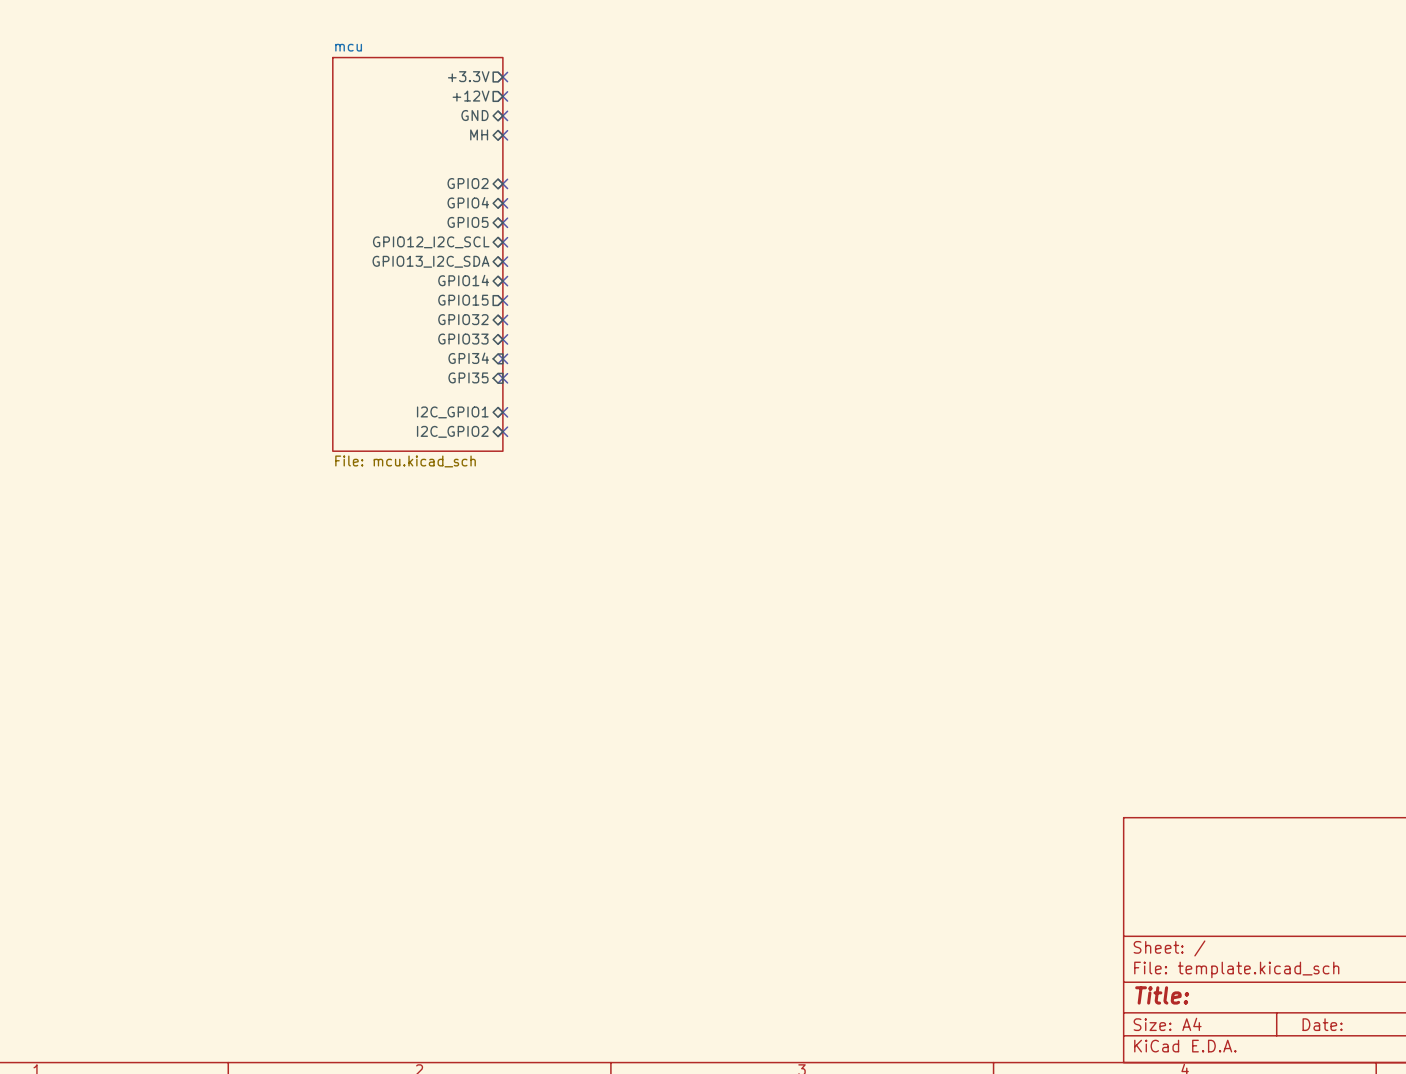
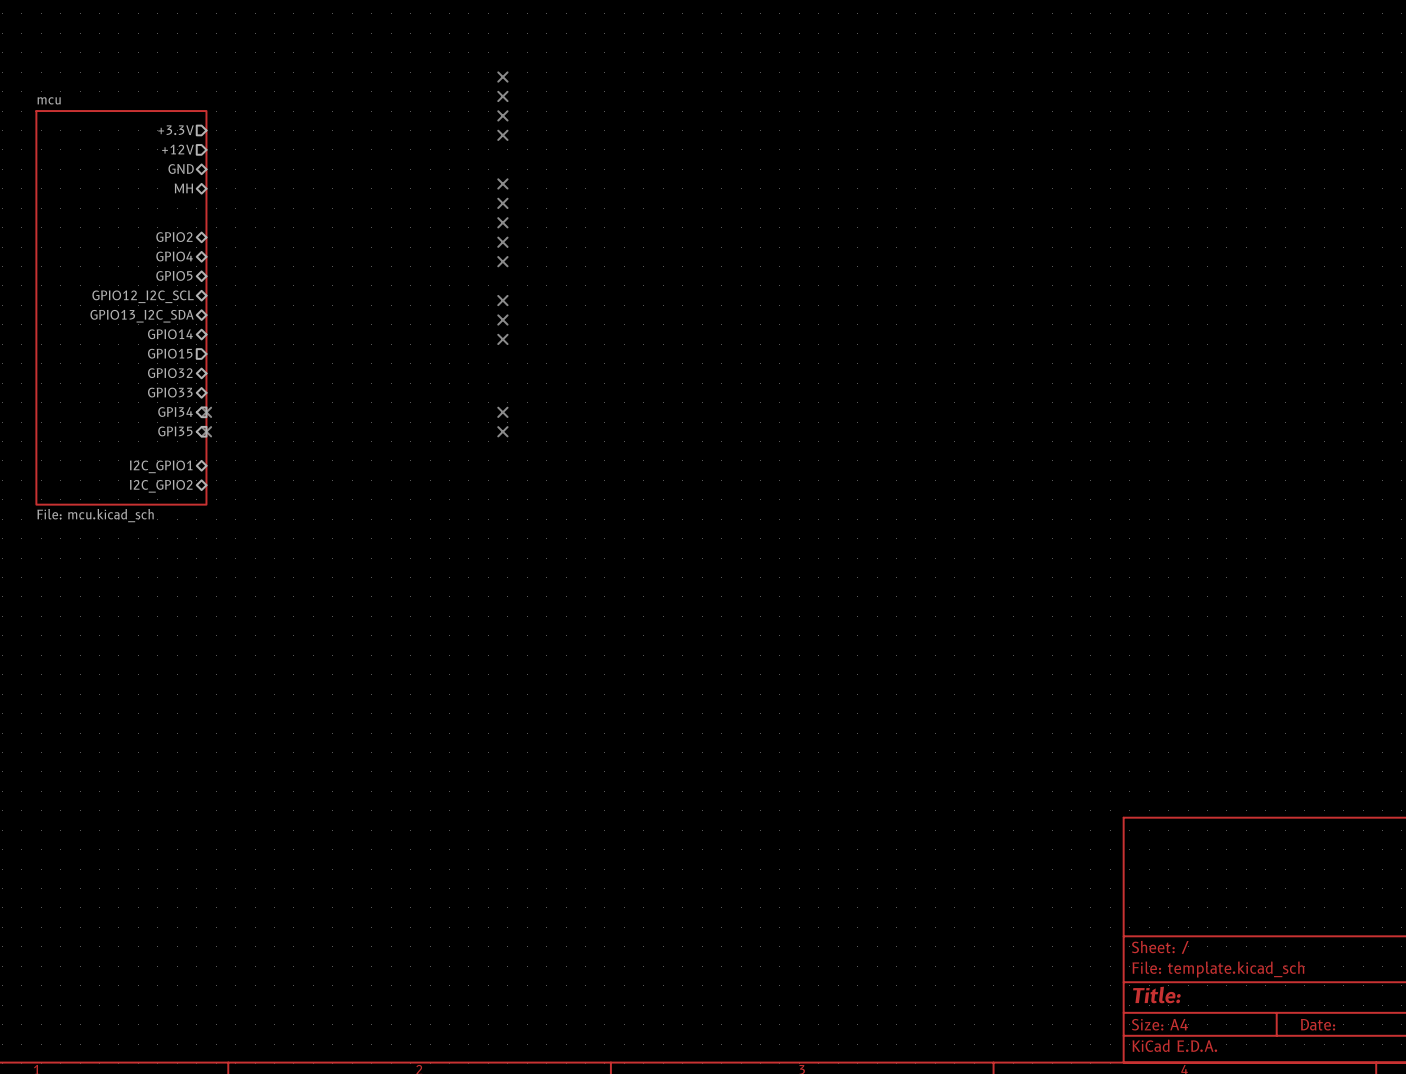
sheet pin: +3.3V (468, 76) -> none
sheet pin: +12V (471, 96) -> none
sheet pin: GND (474, 115) -> none
sheet pin: none -> +3.3V (176, 130)
sheet pin: MH (479, 134) -> none
sheet pin: none -> +12V (177, 149)
sheet pin: none -> GND (181, 169)
sheet pin: GPIO2 (468, 183) -> none
sheet pin: none -> MH (183, 188)
sheet pin: GPIO4 (468, 202) -> none
sheet pin: GPIO5 (468, 222) -> none
sheet pin: none -> GPIO2 (174, 237)
sheet pin: GPIO12_I2C_SCL (431, 242) -> none
sheet mcu: File: mcu.kicad_sch (417, 254) -> none
sheet pin: none -> GPIO4 (174, 256)
sheet pin: GPIO13_I2C_SDA (431, 261) -> none
sheet pin: none -> GPIO5 (174, 275)
sheet pin: GPIO14 (463, 280) -> none
no-connect mark: (502, 281) -> none
sheet pin: none -> GPIO12_I2C_SCL (143, 296)
sheet pin: GPIO15 (463, 300) -> none
sheet mcu: none -> File: mcu.kicad_sch (121, 307)
sheet pin: none -> GPIO13_I2C_SDA (142, 316)
sheet pin: GPIO32 (463, 319) -> none
sheet pin: none -> GPIO14 (170, 334)
sheet pin: GPIO33 (463, 339) -> none
sheet pin: none -> GPIO15 (170, 353)
sheet pin: GPI34 (468, 358) -> none
no-connect mark: (502, 358) -> none
sheet pin: none -> GPIO32 (170, 373)
sheet pin: GPI35 (468, 377) -> none
no-connect mark: (502, 378) -> none
sheet pin: none -> GPIO33 (170, 392)
sheet pin: none -> GPI34 (175, 412)
no-connect mark: none -> (206, 412)
sheet pin: I2C_GPIO1 (452, 412) -> none
sheet pin: none -> GPI35 (175, 431)
no-connect mark: none -> (206, 431)
sheet pin: I2C_GPIO2 (452, 431) -> none
sheet pin: none -> I2C_GPIO1 (161, 466)
sheet pin: none -> I2C_GPIO2 (161, 486)

